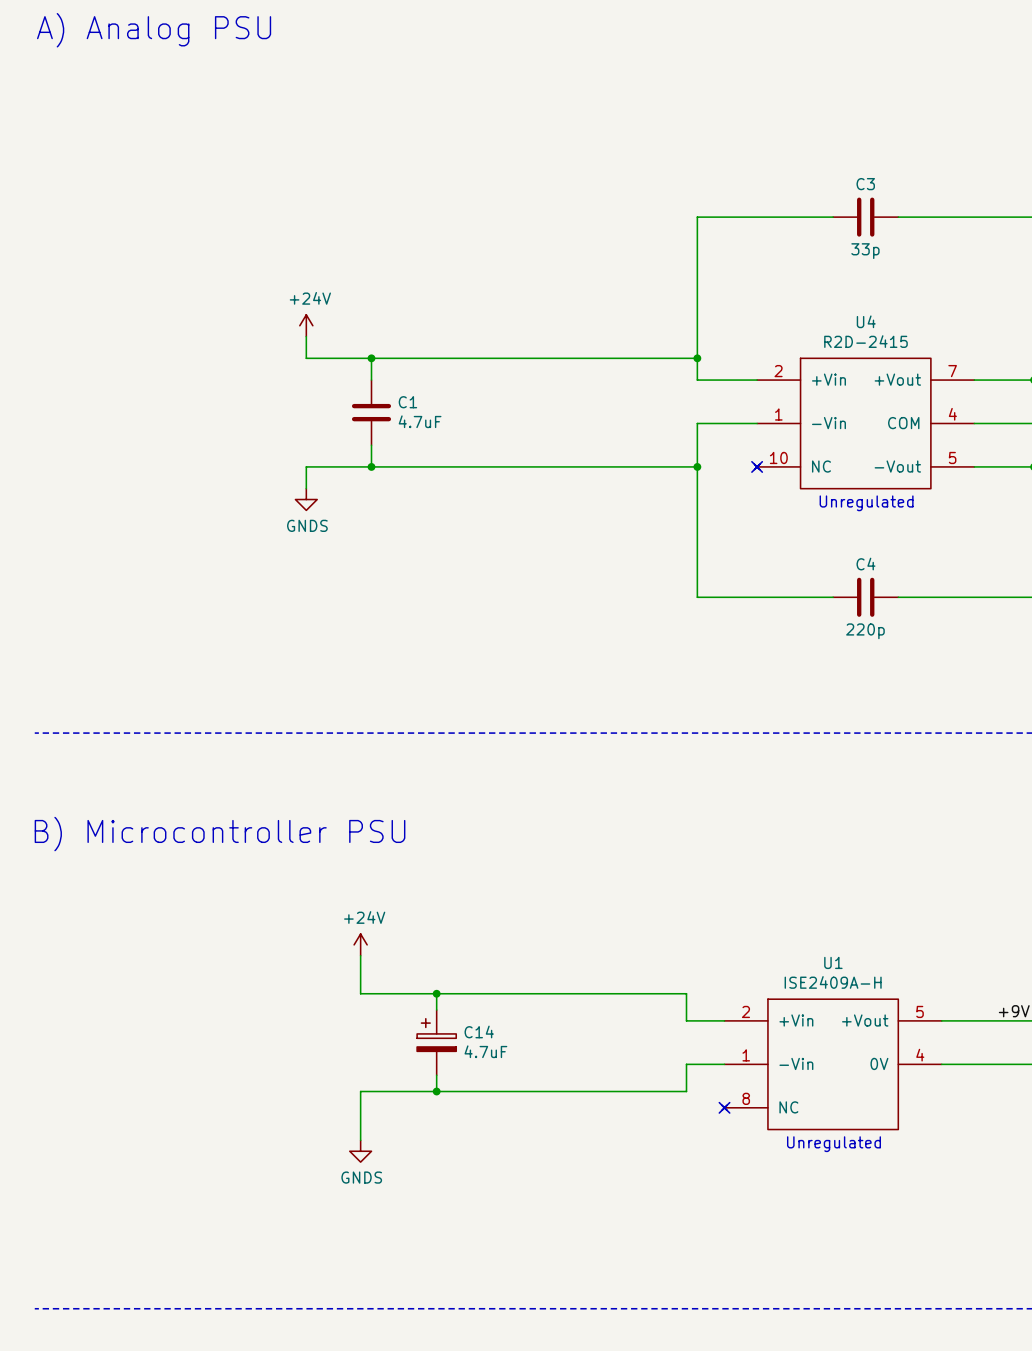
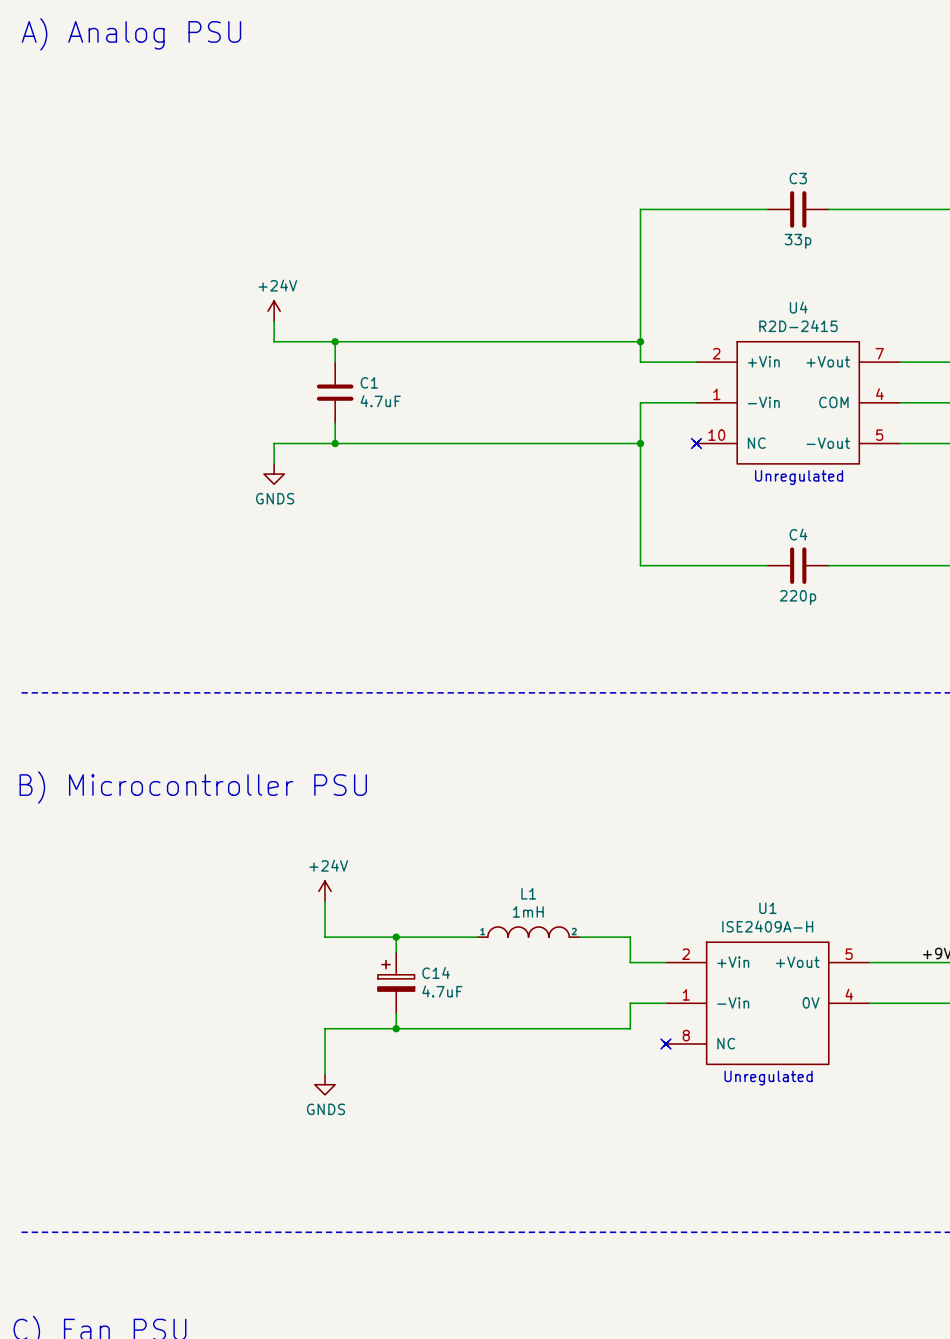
L1: none -> 1mH (528, 932)
wire: (523, 993) (632, 993) -> none

